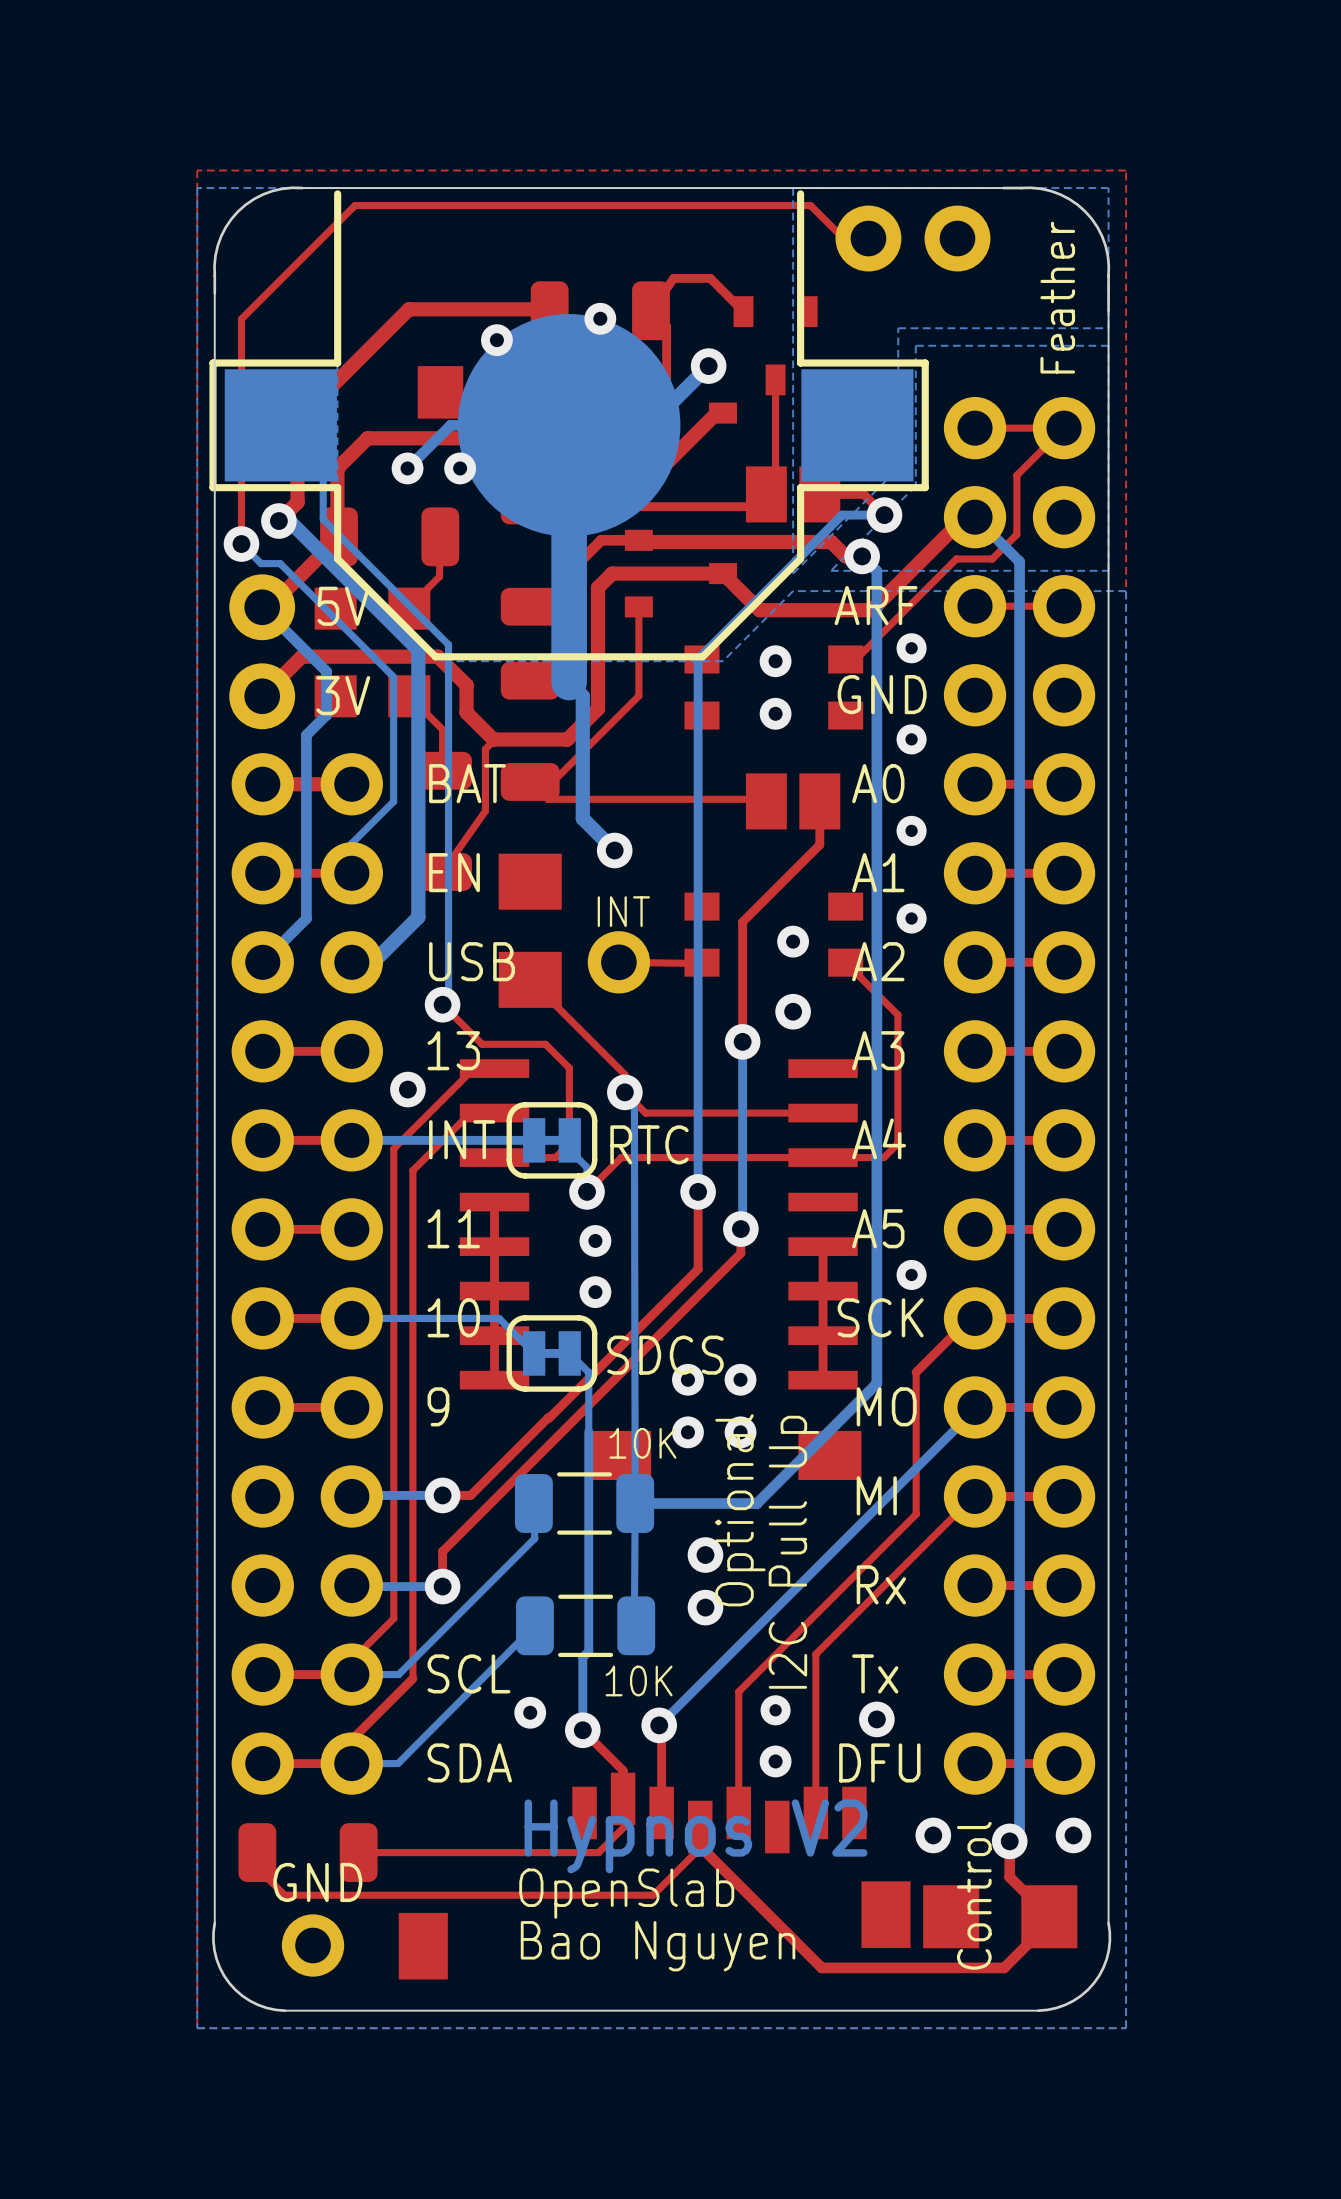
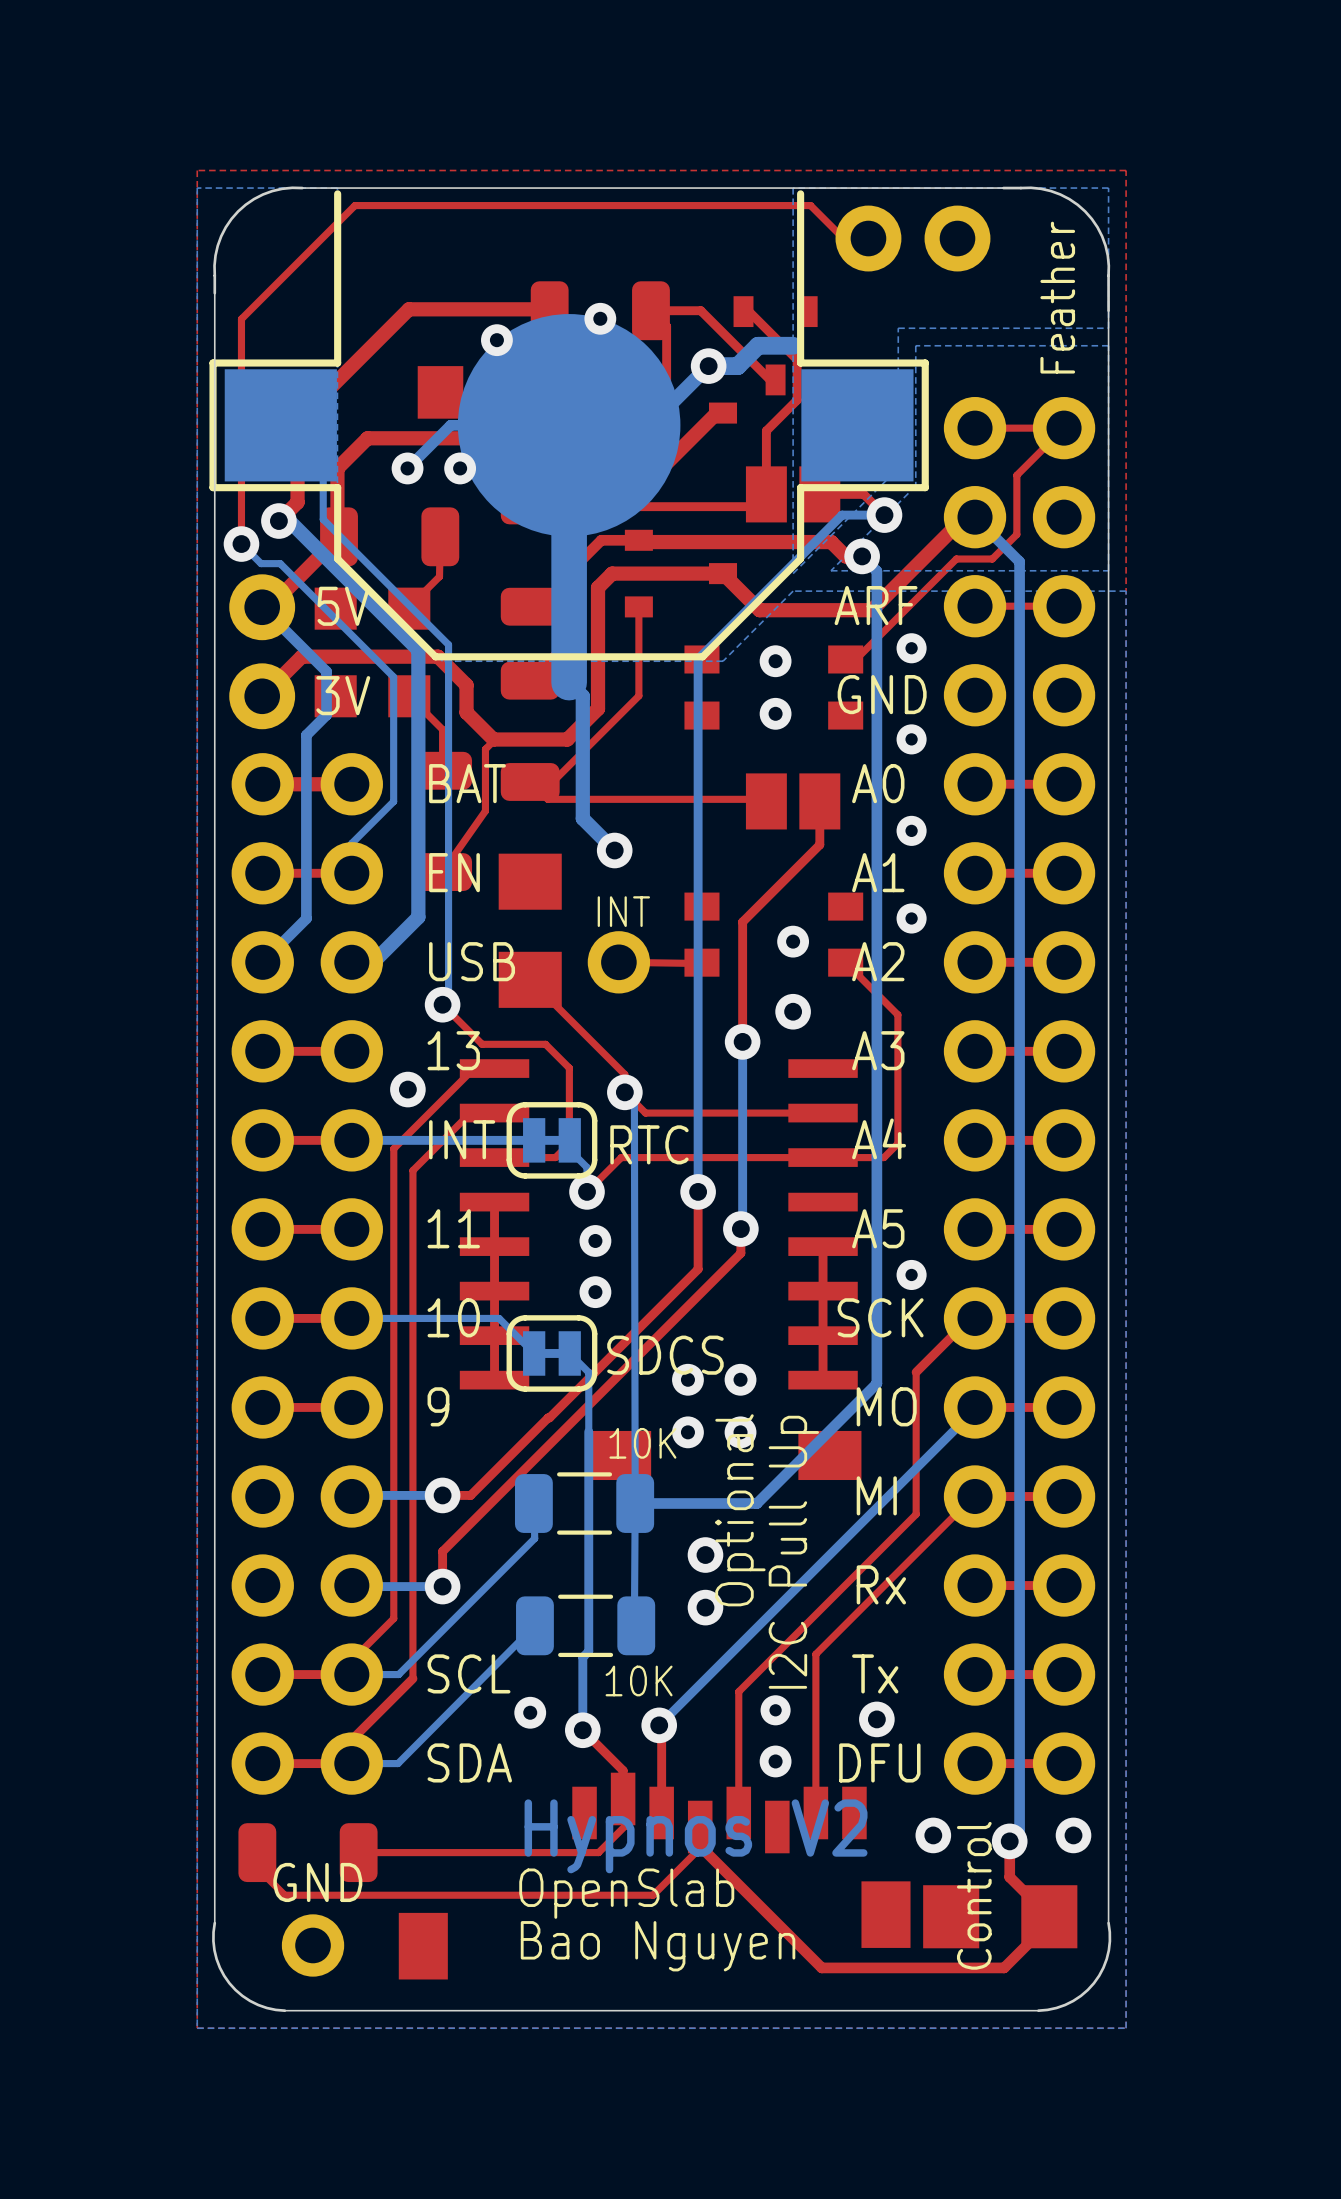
top track: (650, 310) (673, 278) (710, 278) (743, 311) -> (650, 310) (700, 310) (770, 379) (775, 379)
top track: none -> (743, 311) (749, 311) (797, 359) (797, 400) (766, 430) (766, 494)
bottom track: none -> (793, 345) (758, 345) (737, 366) (708, 366)
top track: (775, 379) (775, 485) -> none

